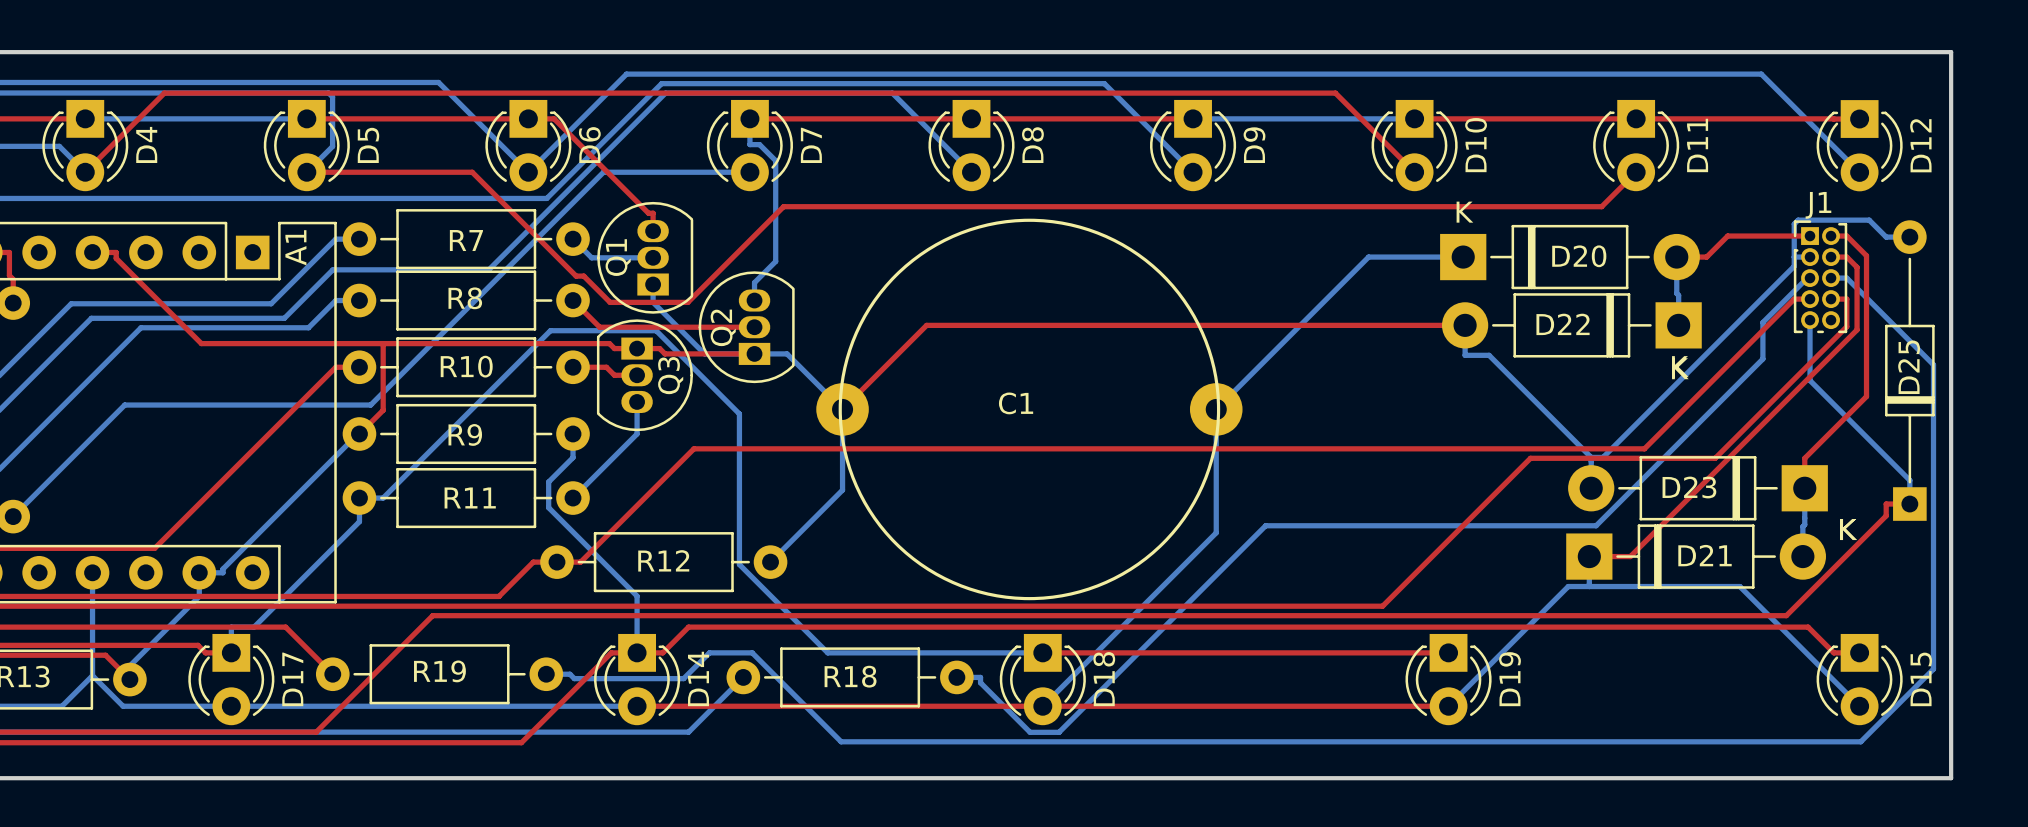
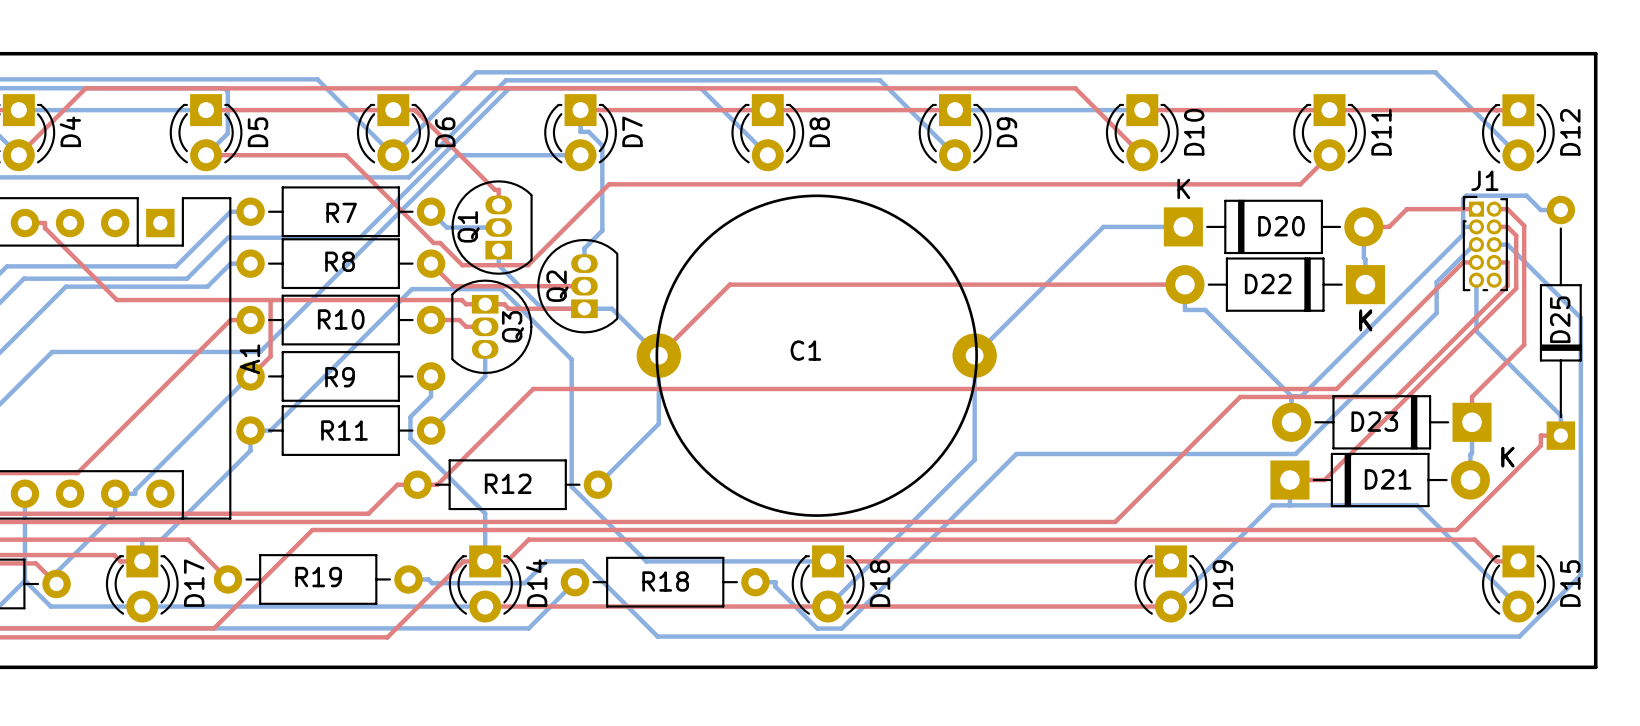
A1 name position: A1 (295, 247) -> A1 (249, 359)

